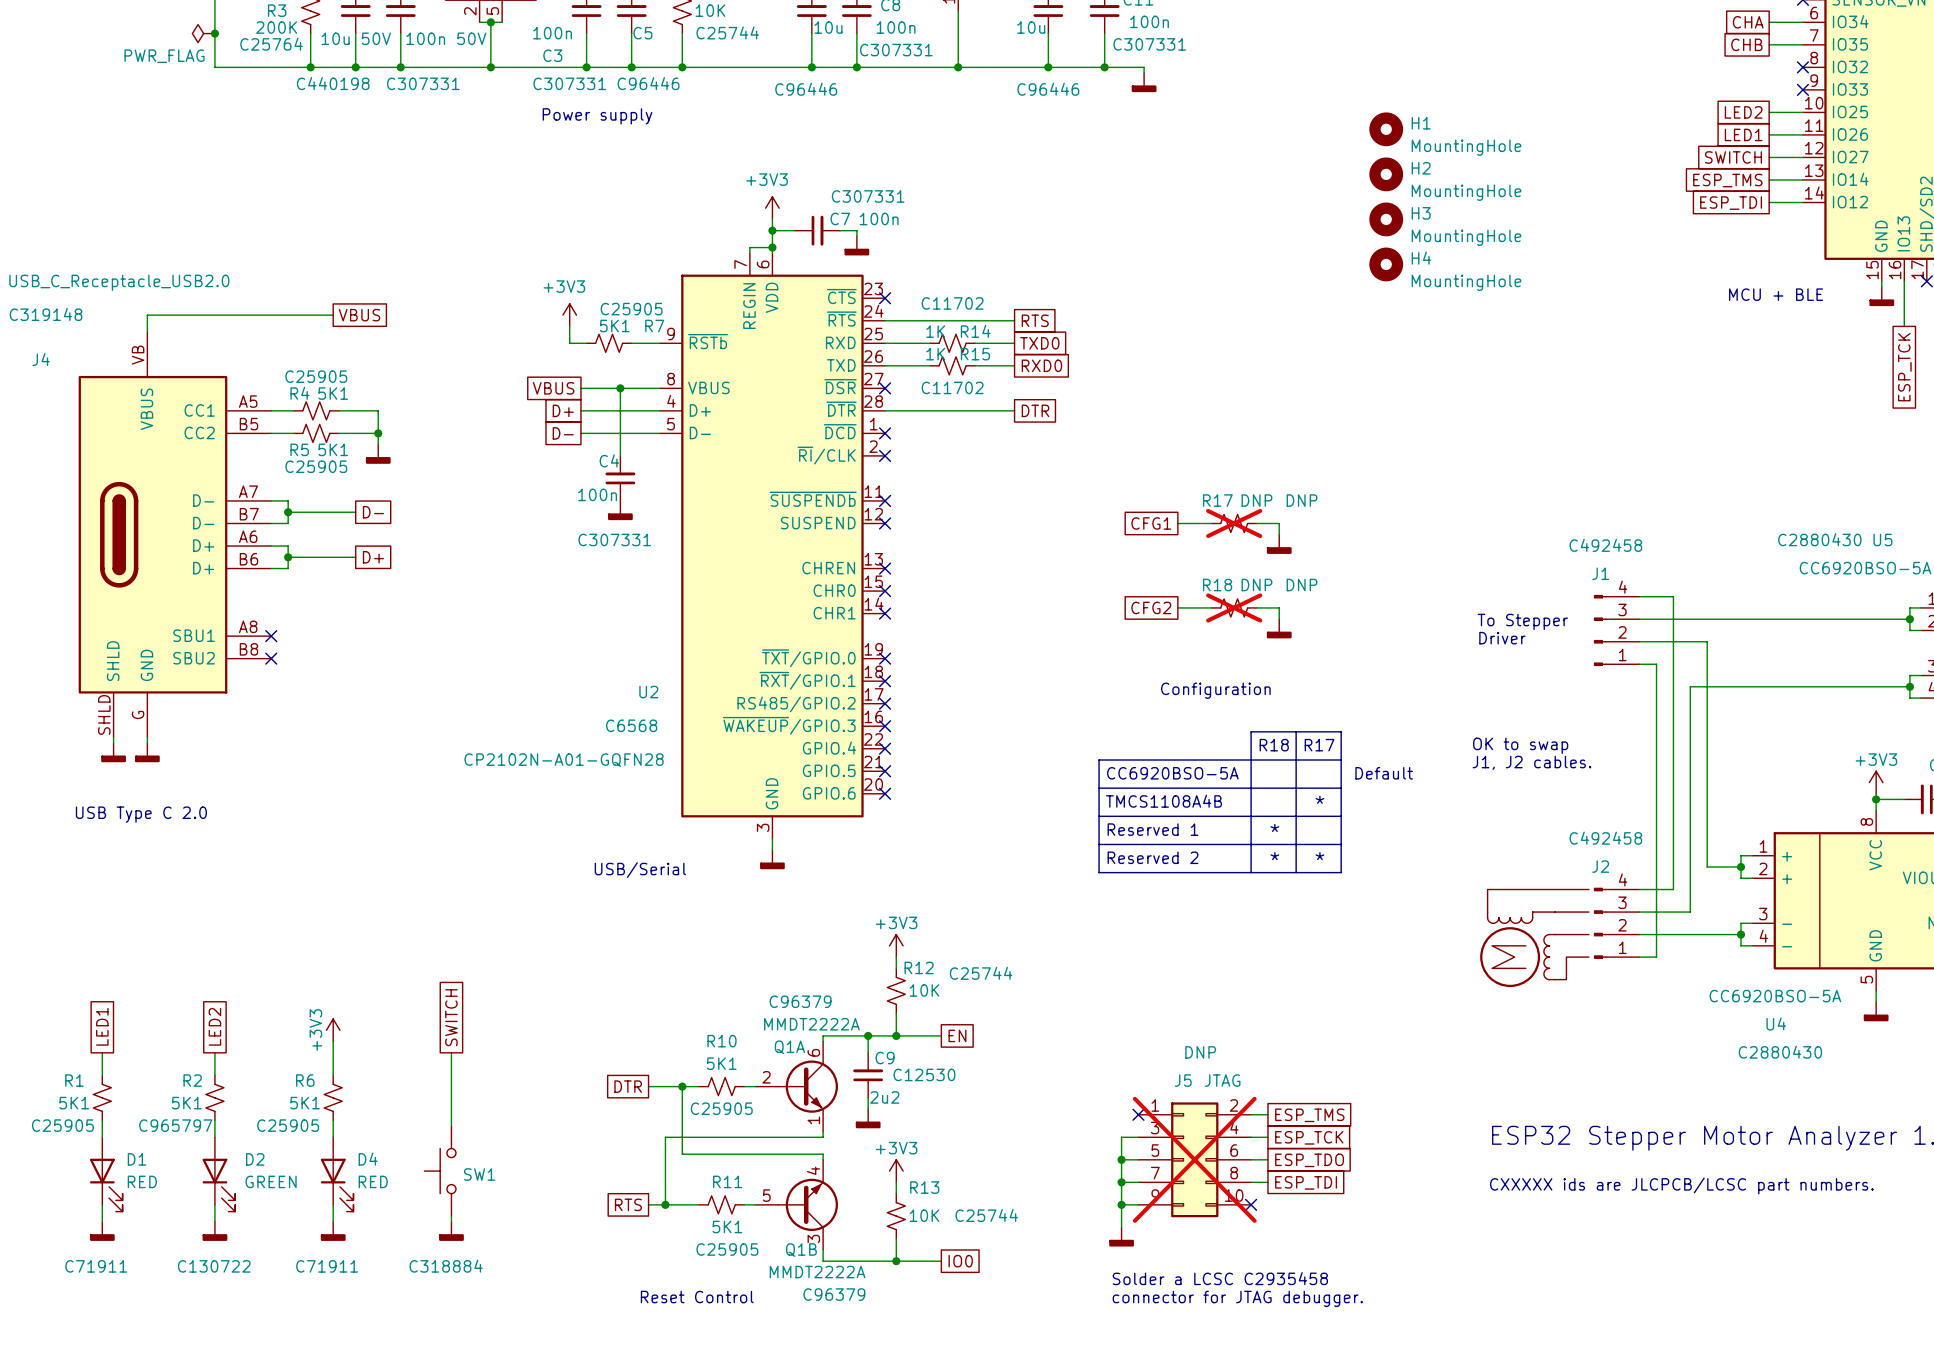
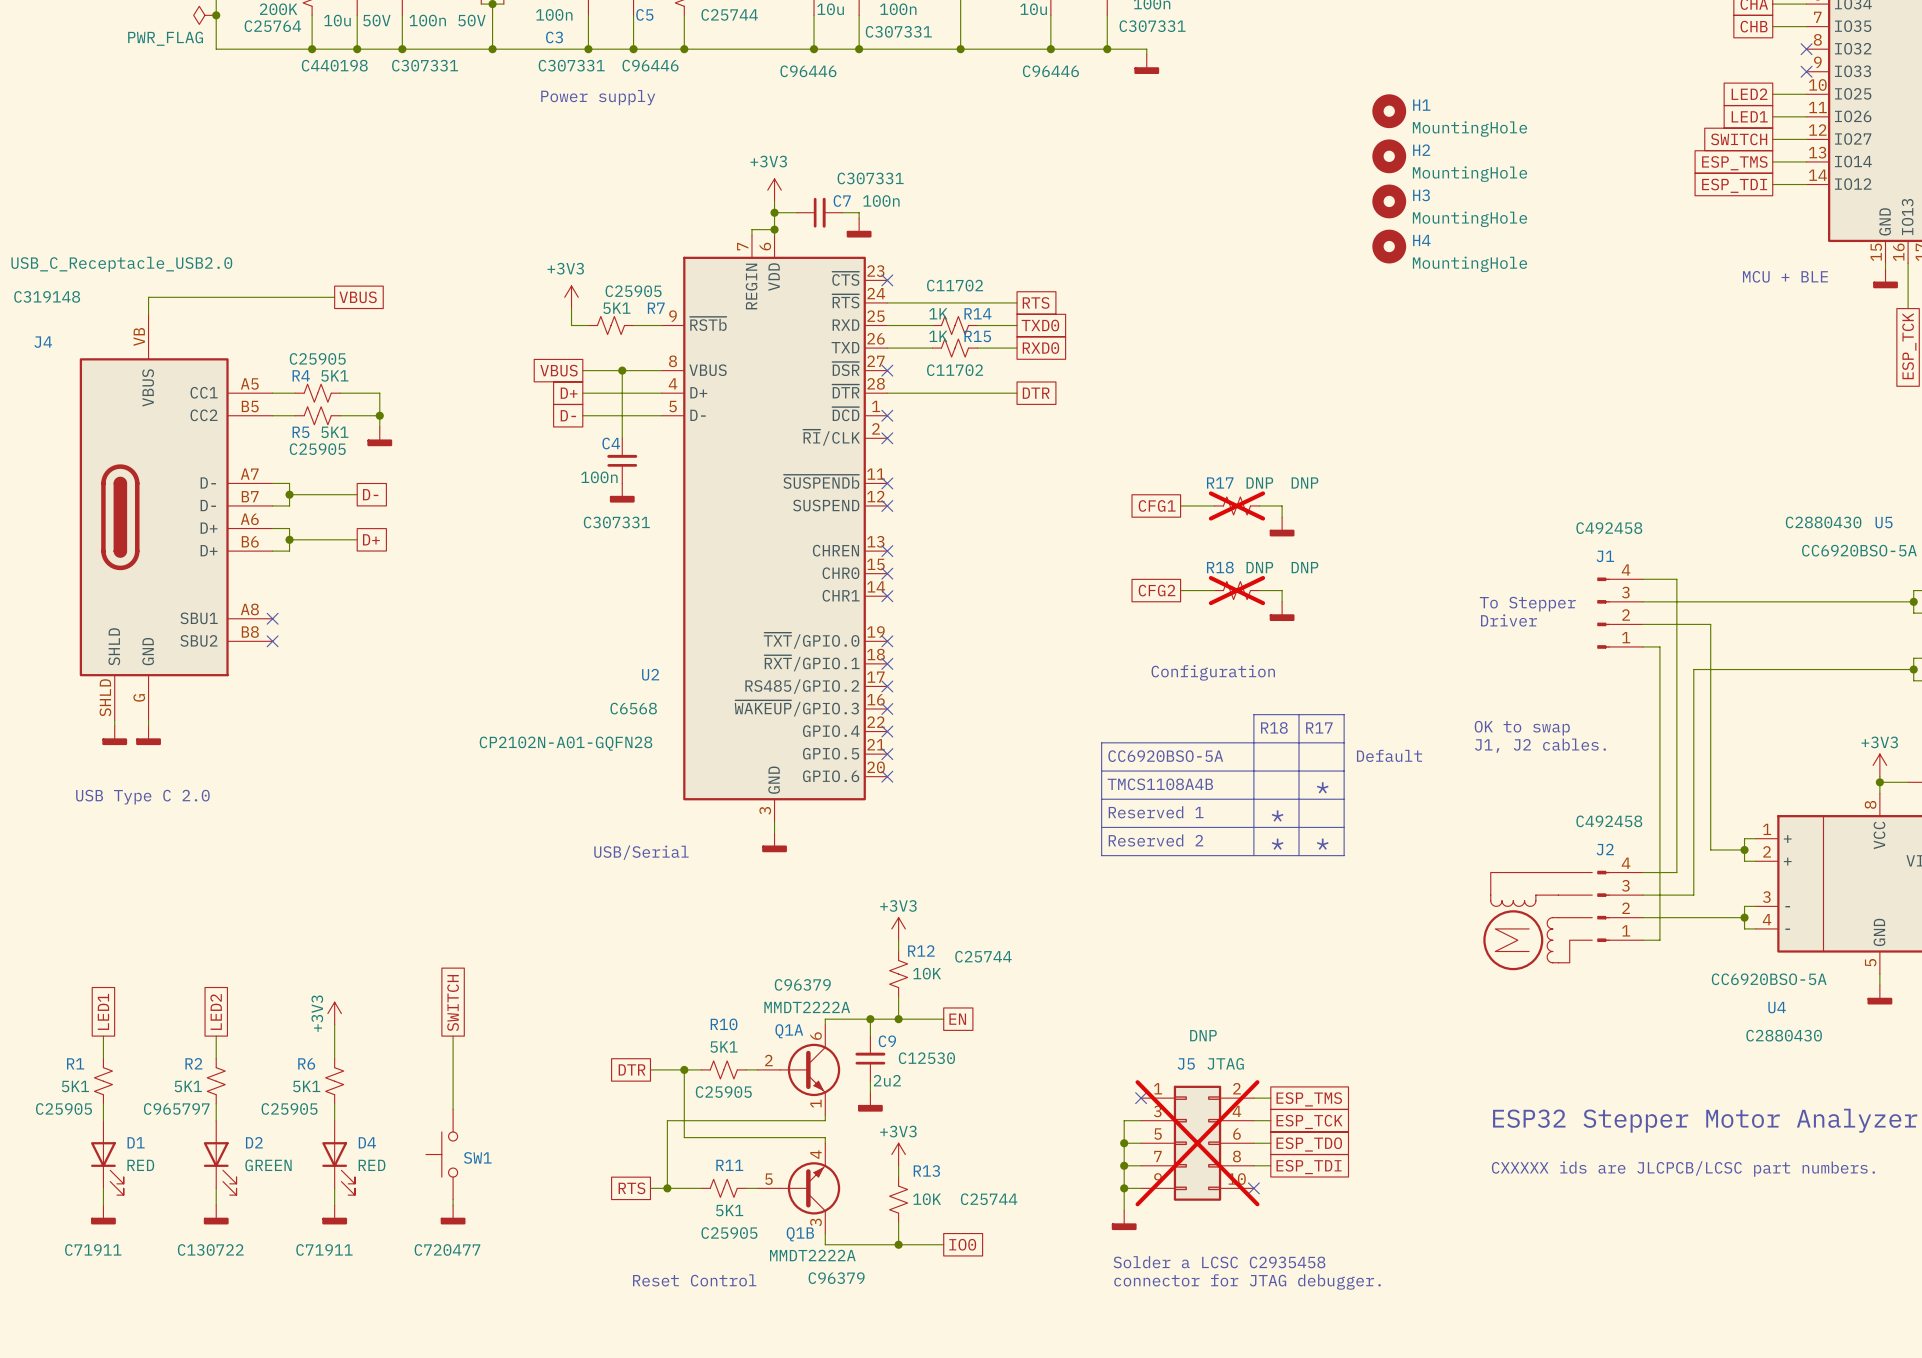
SW1 text: C318884 (446, 1266) -> C720477 (447, 1249)

